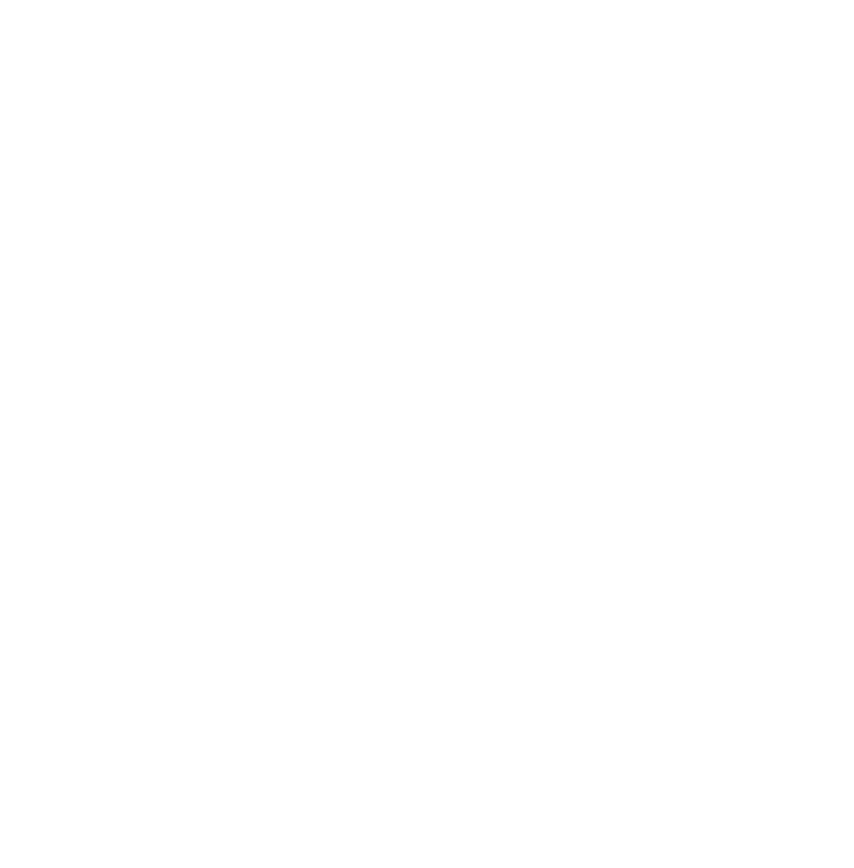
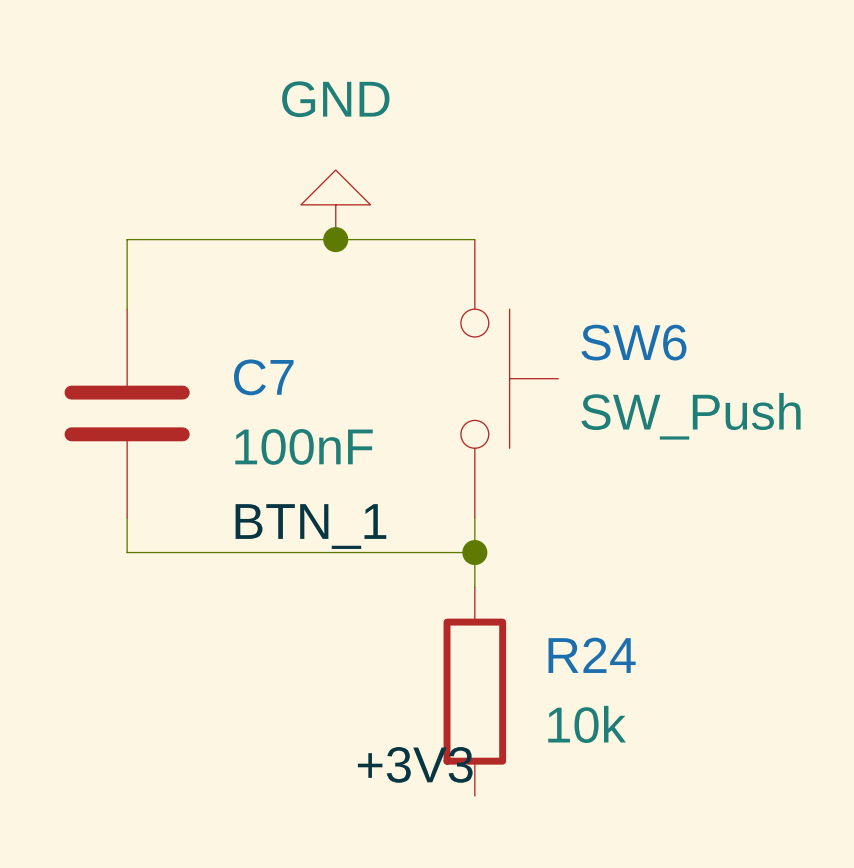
power symbol: none -> GND (335, 204)
junction: none -> (335, 239)
wire: none -> (474, 239) (127, 239) (127, 309)
SW6: none -> SW_Push (509, 378)
C7: none -> 100nF (127, 413)
wire: none -> (127, 517) (127, 552) (474, 552)
wire: none -> (474, 517) (474, 587)
label: none -> BTN_1 (310, 526)
junction: none -> (474, 552)
R24: none -> 10k (474, 691)
label: none -> +3V3 (415, 764)

